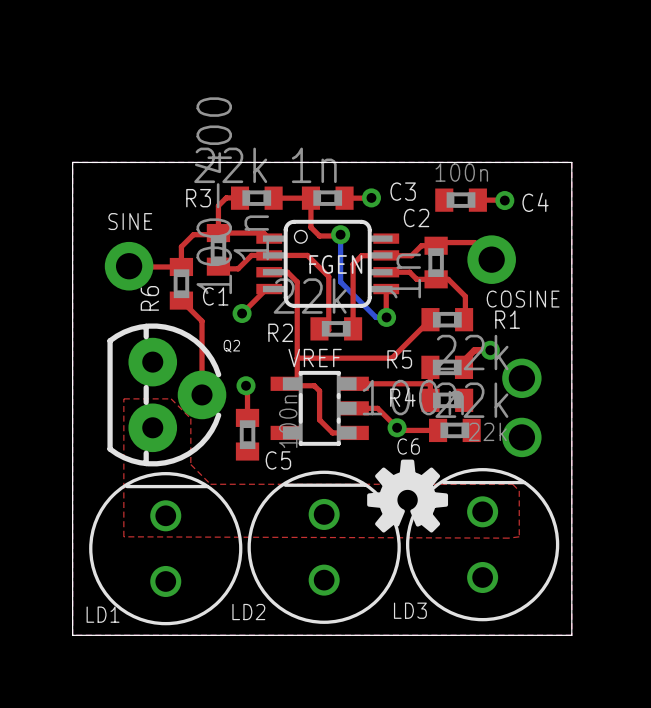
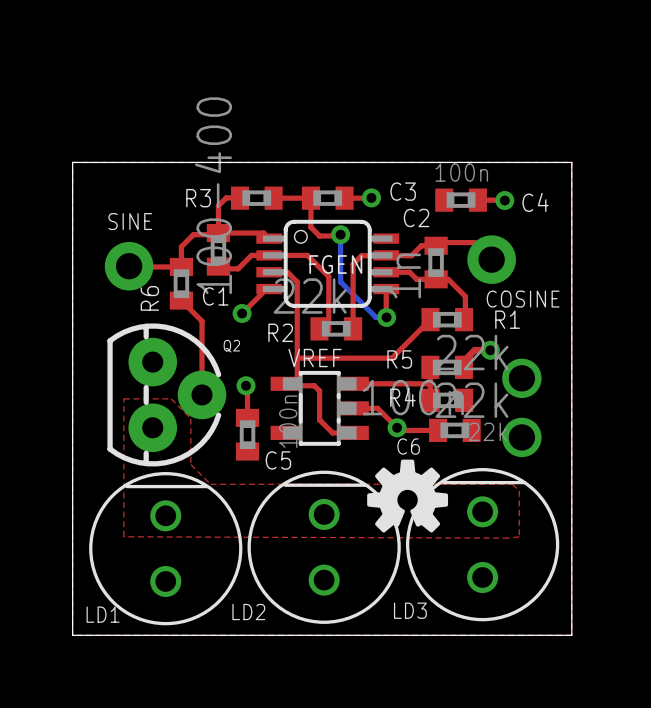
R3 value: 22k (230, 165) -> none
C3 value: 1n (314, 165) -> none
C1 value: 1n (251, 237) -> none

